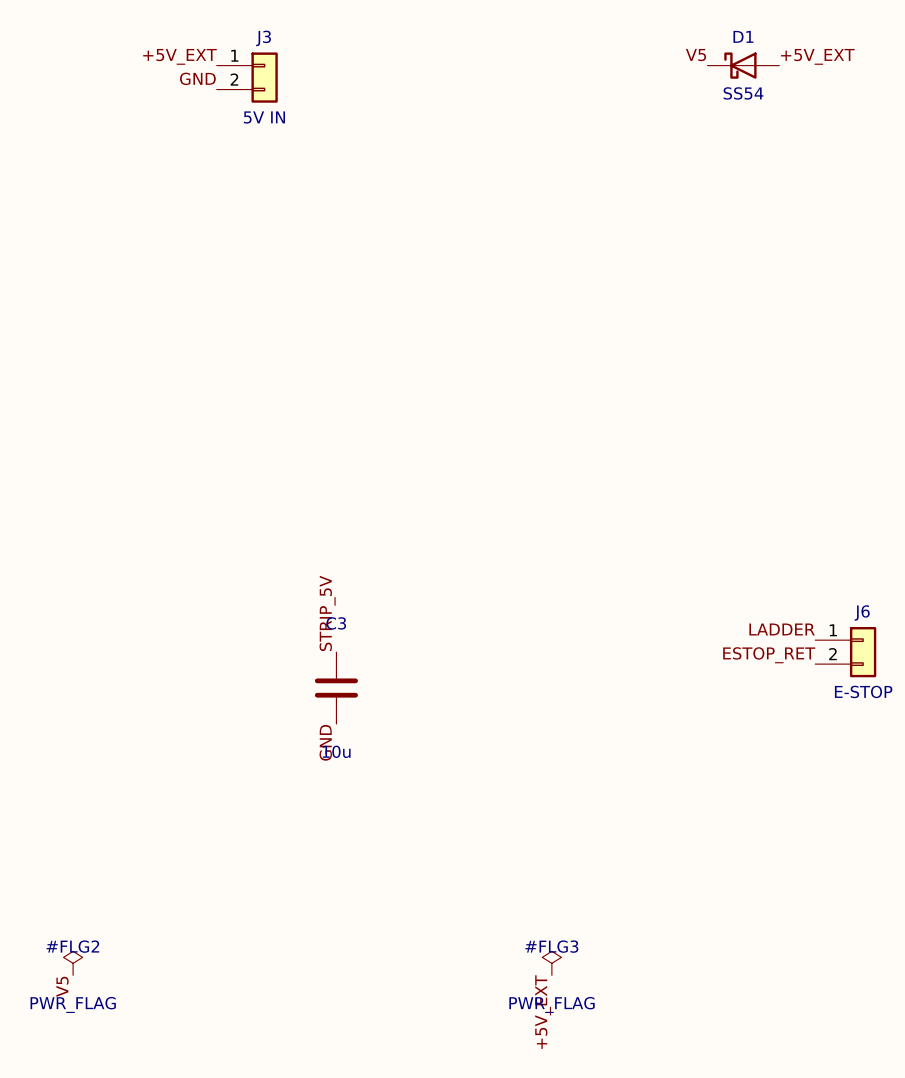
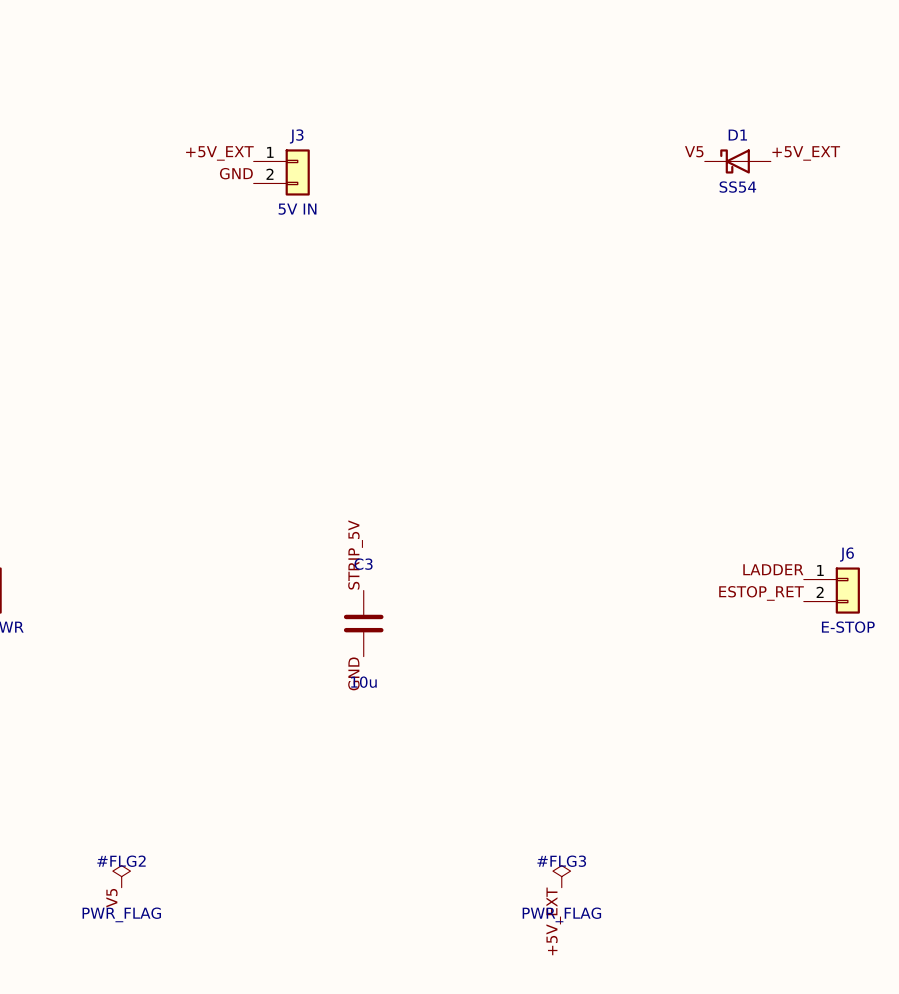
label position: V5 (696, 55) -> V5 (694, 151)
label position: +5V_EXT (179, 56) -> +5V_EXT (219, 153)
label position: +5V_EXT (817, 56) -> +5V_EXT (806, 153)
D1 position: (743, 65) -> (737, 161)
J3 position: (247, 77) -> (281, 172)
label position: GND (197, 78) -> GND (236, 173)

